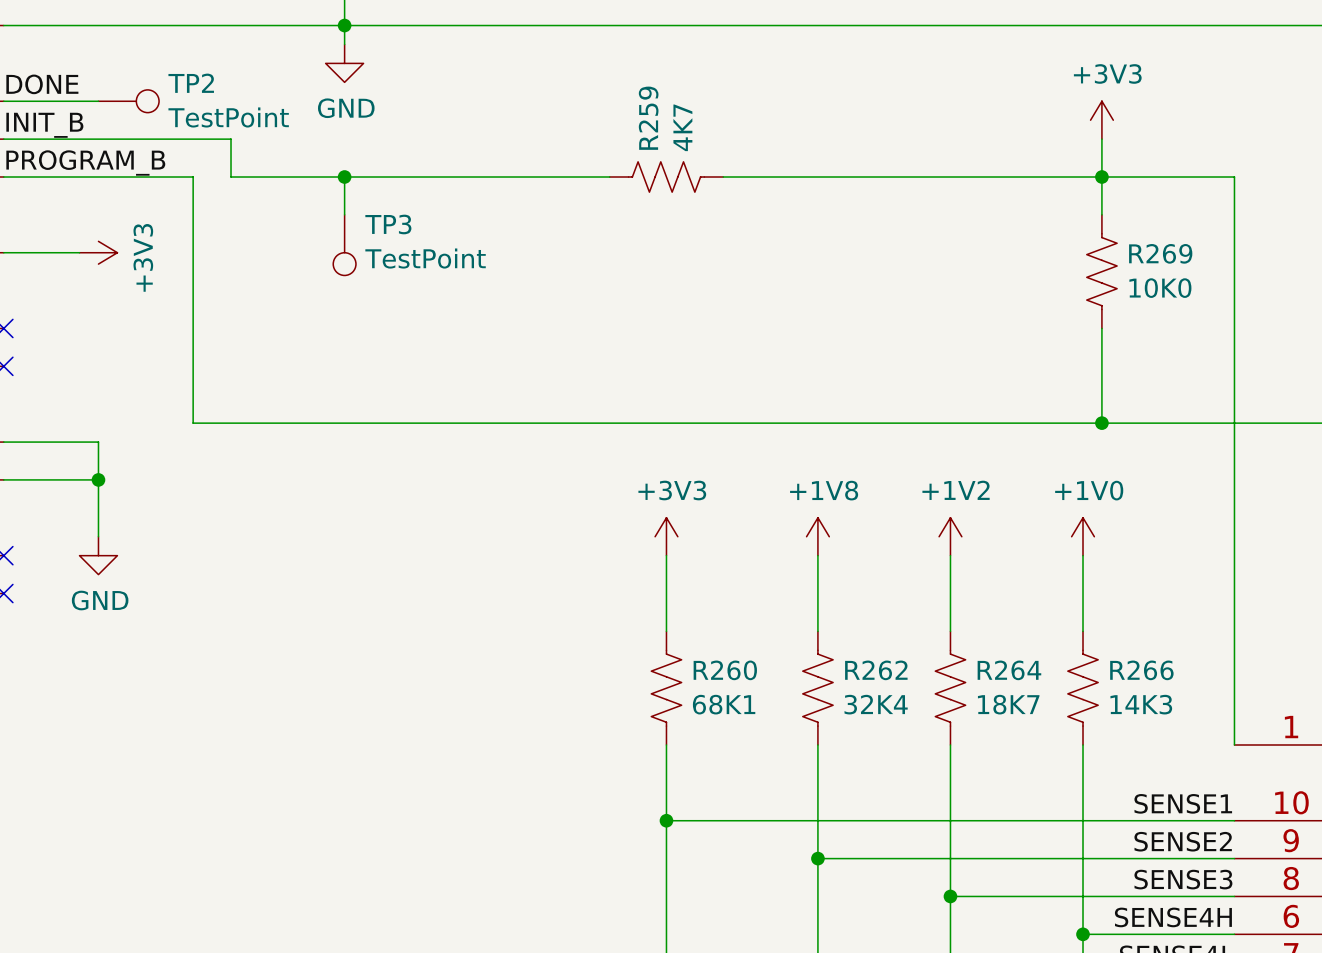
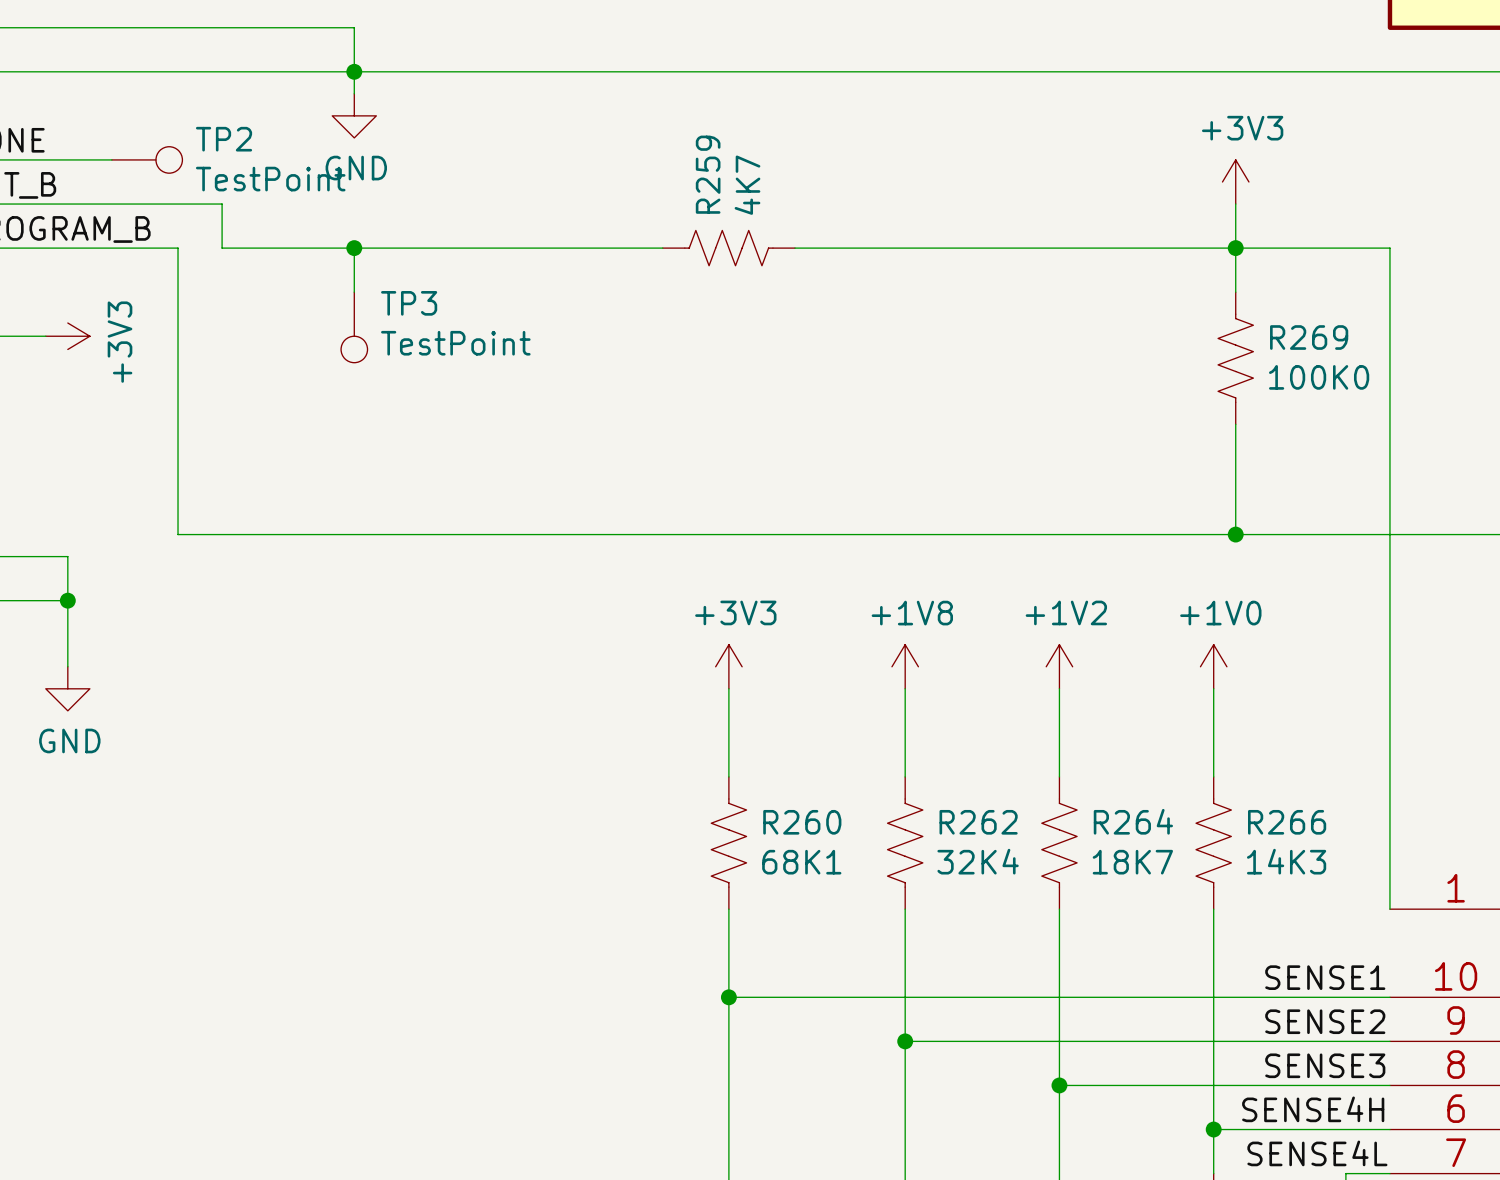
TP2 position: (128, 101) -> (147, 159)
R269 value: 10K0 (1160, 288) -> 100K0 (1319, 377)

